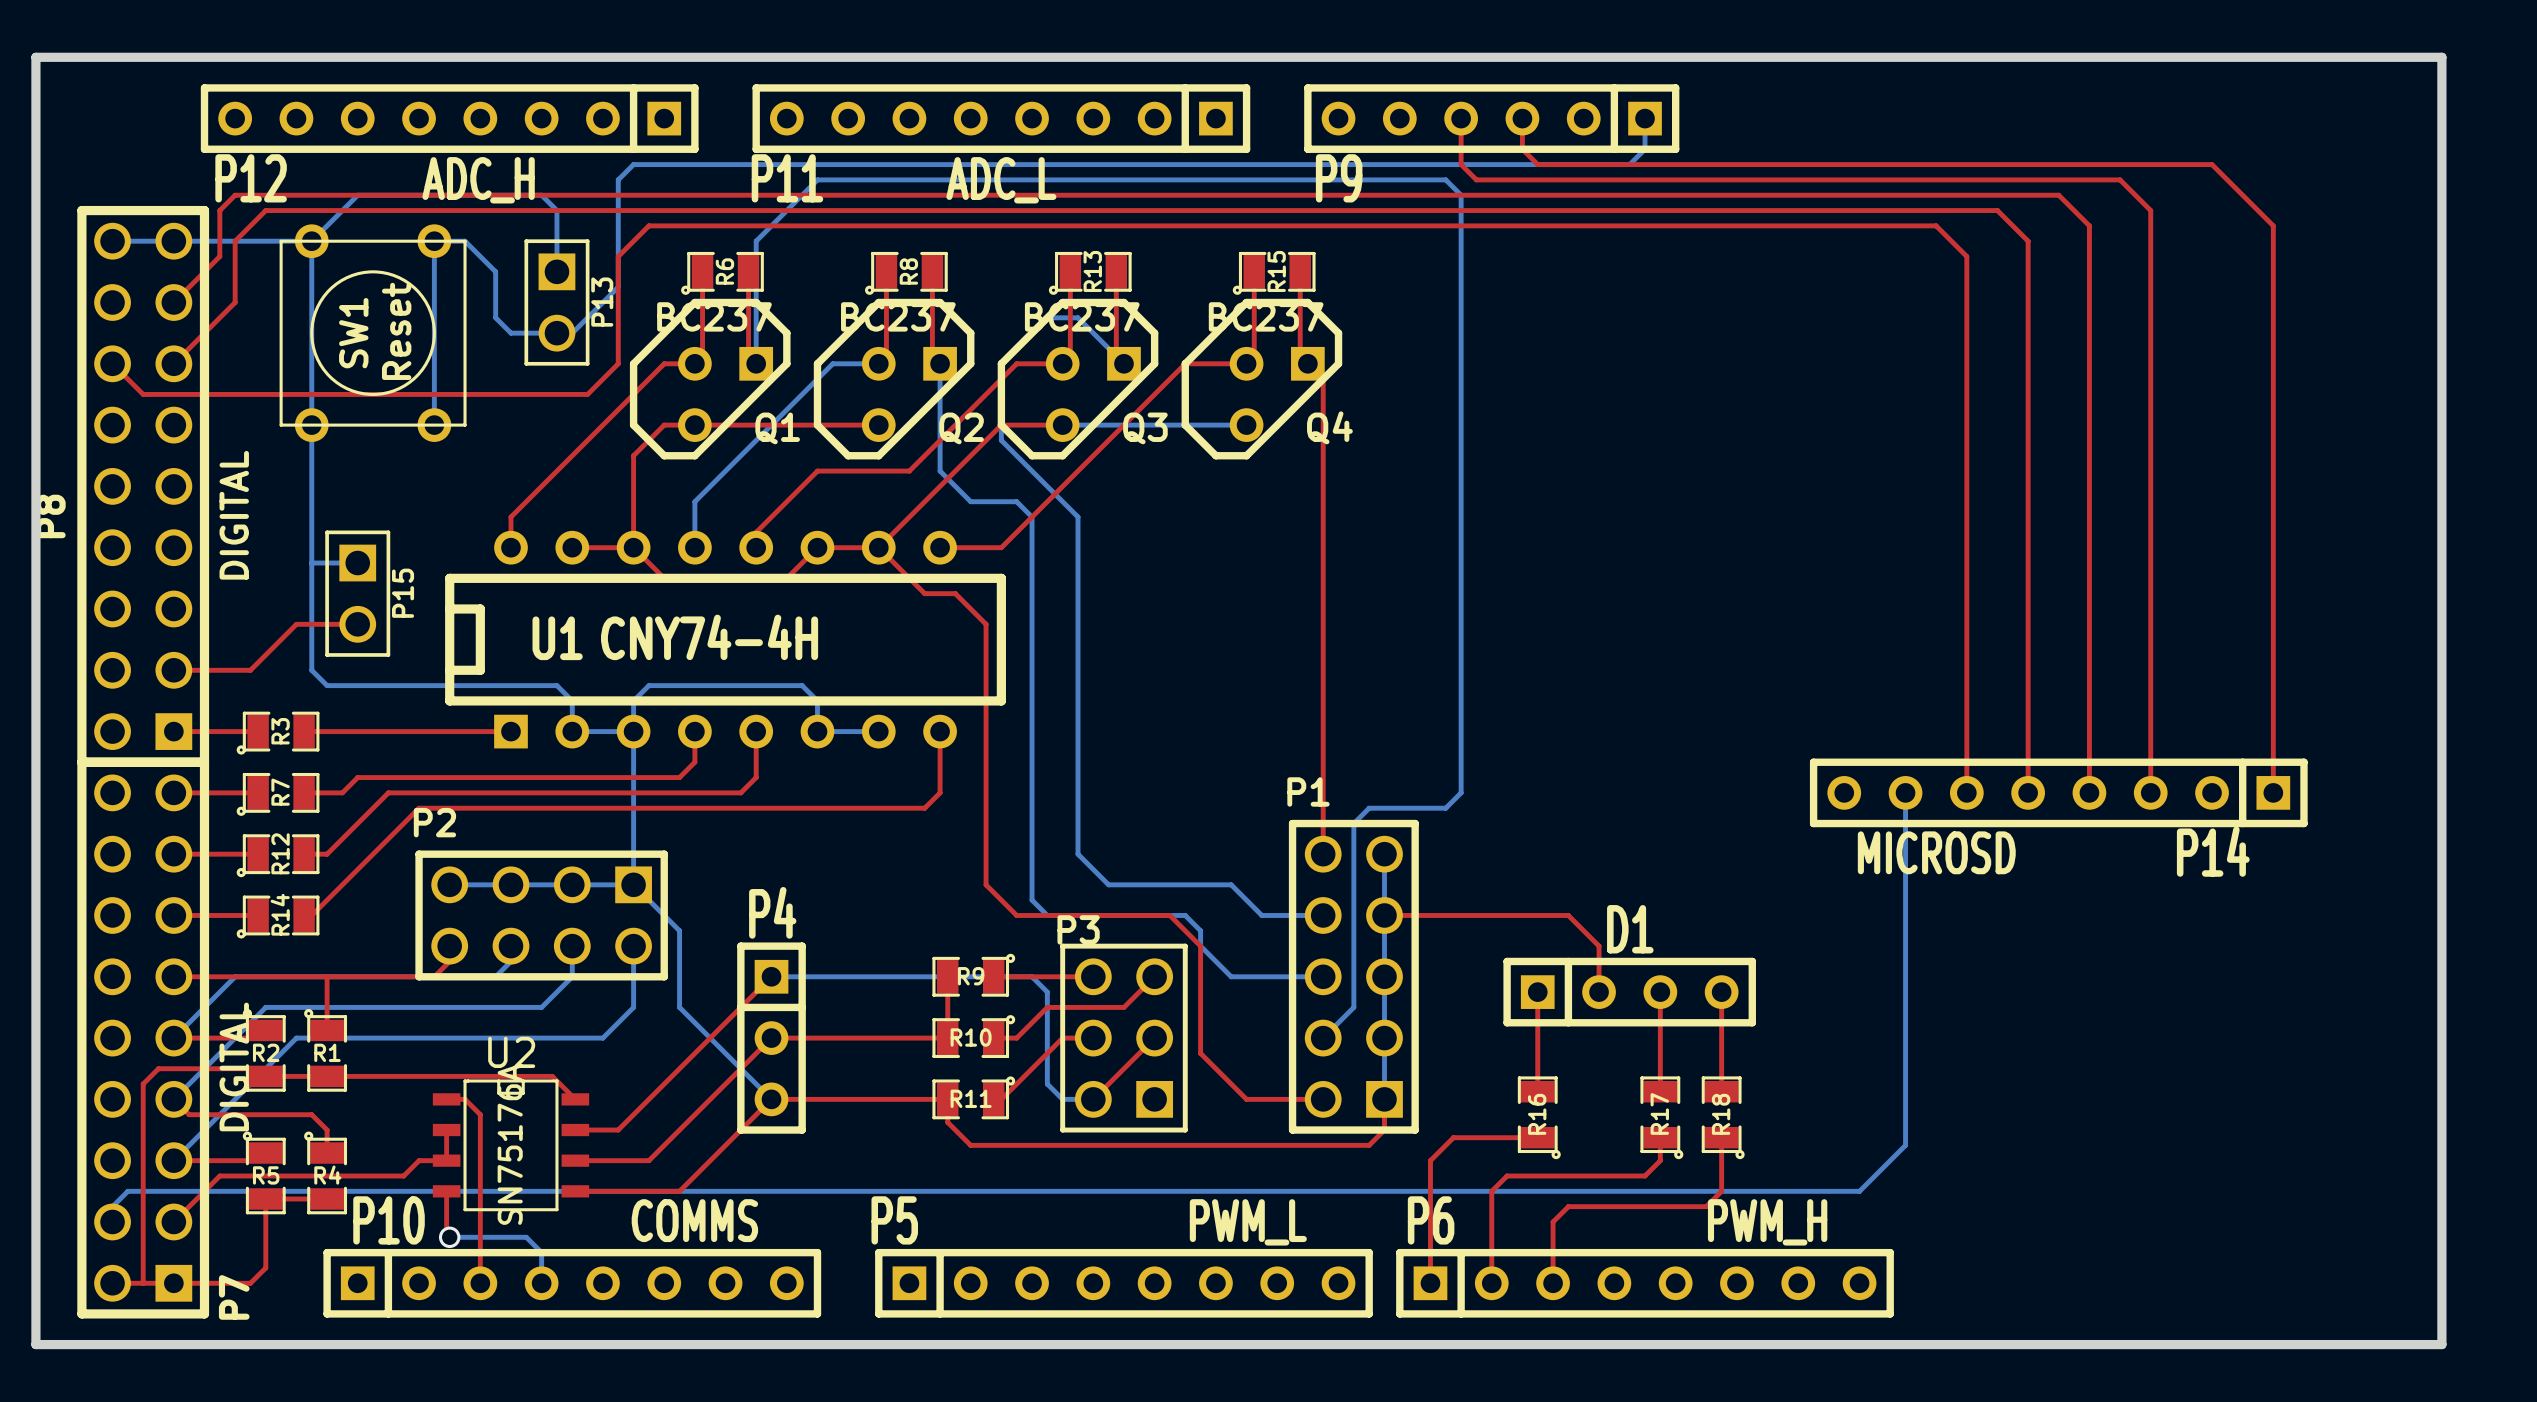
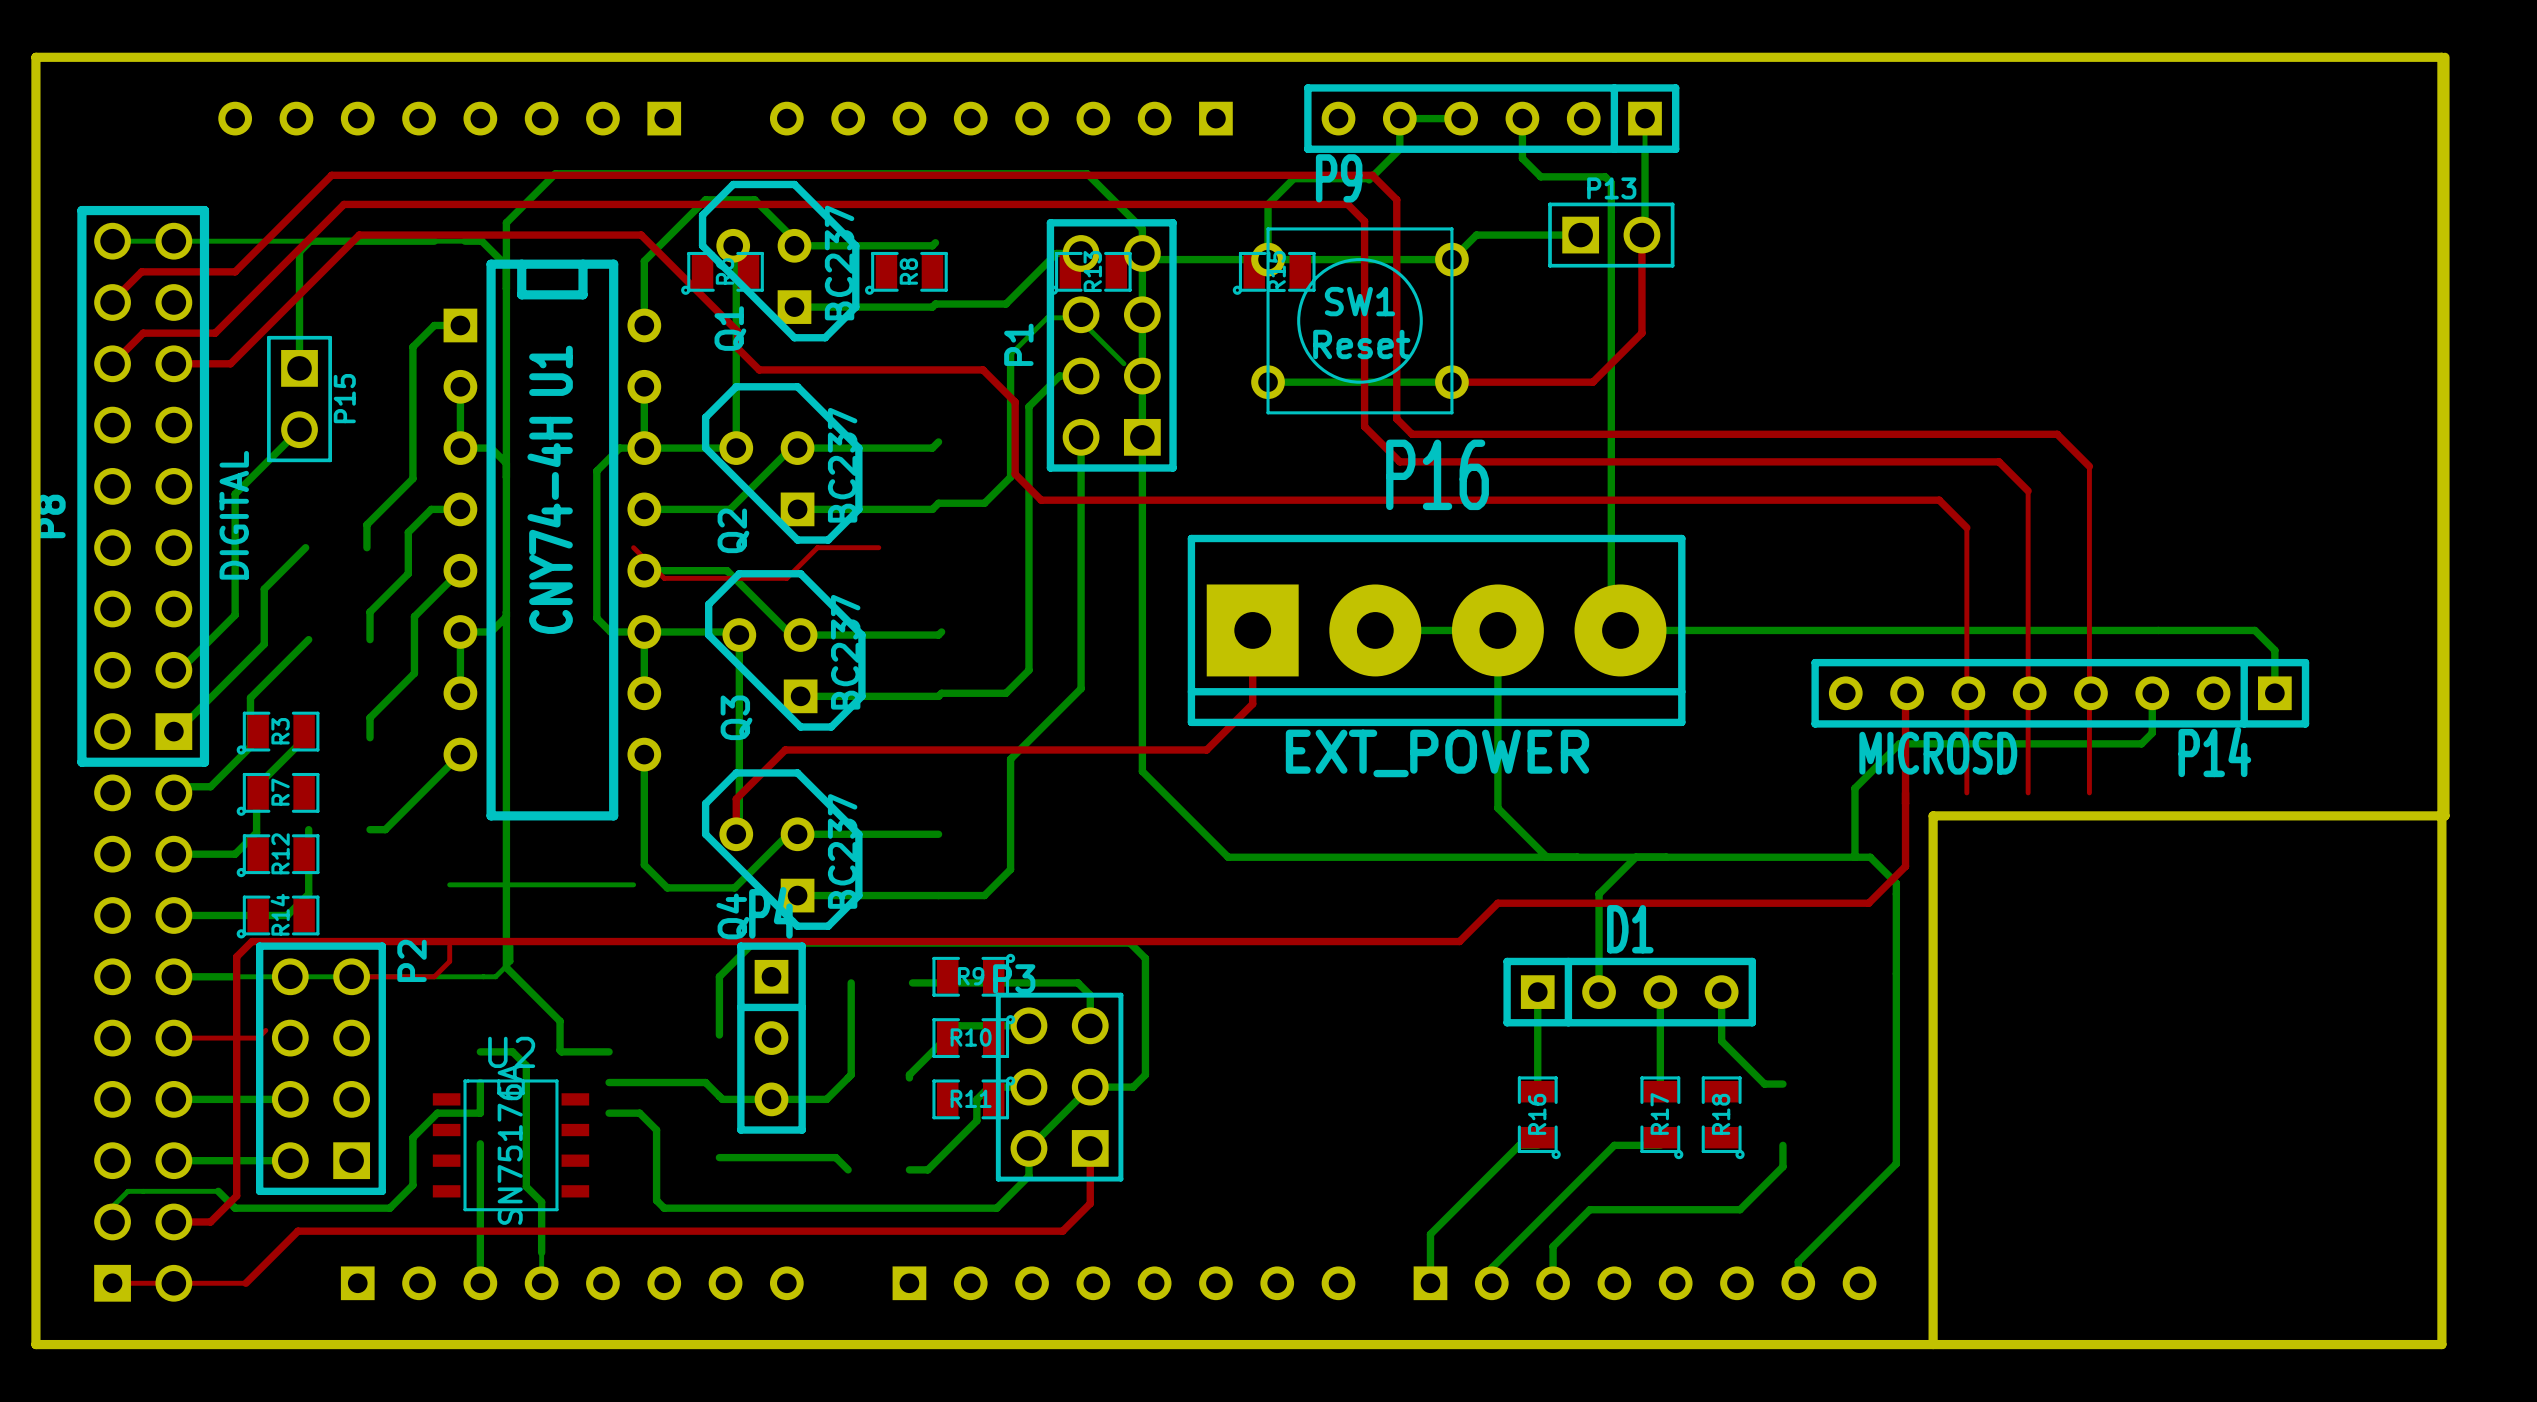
board edge: none -> (2444, 57) (2444, 815) (1933, 815) (1933, 1343)
P12 side: top (449, 118) -> bottom (449, 118)
P11 side: top (1001, 118) -> bottom (1001, 118)
top track: (1461, 118) (1461, 164) (1476, 179) (2120, 179) (2150, 210) (2150, 792) -> none
bottom track: none -> (1522, 118) (1522, 158) (1540, 176) (1605, 176) (1611, 182) (1611, 621) (1620, 630) (2254, 630) (2274, 650) (2274, 693)
top track: (1522, 118) (1522, 149) (1537, 164) (2212, 164) (2273, 225) (2273, 792) -> none
bottom track: (1645, 149) (1629, 164) (633, 164) (618, 179) (618, 287) (572, 333) (510, 333) (495, 317) (495, 271) (465, 241) -> (506, 265) (481, 241) (465, 241)
bottom track: none -> (1645, 149) (1645, 232) (1641, 235)
bottom track: (1292, 179) (817, 179) (756, 241) (756, 363) -> (1292, 179) (1268, 204) (1268, 259)
bottom track: (1369, 179) (1445, 179) (1461, 195) (1461, 792) (1445, 808) (1369, 808) (1353, 823) (1353, 1007) (1323, 1038) -> (1369, 179) (1399, 149) (1399, 118) (1461, 118)
bottom track: none -> (1580, 235) (1476, 235) (1451, 259) (1148, 259) (1142, 253)
top track: none -> (1641, 235) (1641, 333) (1592, 382) (1451, 382)
bottom track: none -> (310, 241) (299, 251) (299, 368)
bottom track: (434, 241) (434, 425) -> (434, 241) (311, 241)
bottom track: none -> (935, 242) (932, 245) (794, 245) (794, 239) (754, 199) (705, 199) (644, 261) (644, 325)
bottom track: none -> (733, 245) (736, 248) (736, 448) (619, 448) (596, 471) (596, 618) (610, 631) (736, 631) (739, 635) (739, 831) (736, 834)
bottom track: none -> (1081, 253) (1056, 253) (1005, 304) (935, 304) (932, 307) (794, 307)
bottom track: (556, 271) (556, 210) (541, 195) (357, 195) (311, 241) (311, 670) (327, 685) (556, 685) (572, 700) (572, 731) (633, 731) -> none
top track: (702, 271) (702, 356) (694, 363) (664, 363) (510, 517) (510, 547) -> none
top track: (748, 271) (748, 356) (756, 363) -> none
top track: (886, 271) (886, 356) (878, 363) -> none
top track: (932, 271) (932, 356) (940, 363) -> none
top track: (1070, 271) (1070, 356) (1062, 363) (1016, 363) (909, 471) (817, 471) (756, 532) (756, 547) -> none
top track: (1116, 271) (1116, 356) (1123, 363) -> none
top track: (1254, 271) (1254, 356) (1246, 363) (1185, 363) (1001, 547) (940, 547) -> none
top track: (1300, 271) (1300, 356) (1323, 379) (1323, 854) -> none
top track: (173, 302) (219, 256) (219, 210) (235, 195) (2058, 195) (2089, 225) (2089, 466) -> (112, 302) (141, 271) (235, 271) (331, 175) (1372, 175) (1396, 199) (1396, 418) (1412, 434) (2057, 434) (2089, 466)
P13 rotation: 0° (556, 302) -> 90° counterclockwise (1611, 235)
P13 position: (556, 302) -> (1611, 235)
bottom track: none -> (460, 325) (434, 325) (412, 346) (412, 478) (366, 524) (366, 547)
SW1 rotation: 0° (373, 333) -> 90° clockwise (1359, 320)
SW1 position: (373, 333) -> (1359, 320)
bottom track: (1010, 354) (1001, 363) (1001, 440) (1078, 517) (1078, 854) (1108, 884) (1231, 884) (1261, 915) (1323, 915) -> (1010, 354) (1010, 477) (984, 503) (938, 503) (932, 509) (797, 509)
top track: (112, 363) (143, 394) (587, 394) (618, 363) (618, 256) (648, 225) (1936, 225) (1966, 256) (1966, 527) -> (173, 363) (230, 363) (359, 235) (641, 235) (737, 331) (737, 348) (759, 369) (982, 369) (1015, 402) (1015, 474) (1041, 500) (1939, 500) (1966, 527)
top track: (173, 363) (235, 302) (235, 241) (265, 210) (1997, 210) (2028, 241) (2028, 490) -> (112, 363) (143, 333) (215, 333) (343, 204) (1347, 204) (1364, 221) (1364, 426) (1399, 461) (1999, 461) (2028, 490)
bottom track: (878, 363) (832, 363) (694, 501) (694, 547) -> none
bottom track: (940, 363) (940, 471) (970, 501) (1016, 501) (1032, 517) (1032, 900) (1047, 915) (1185, 915) (1200, 930) (1200, 946) (1231, 976) (1323, 976) -> none
bottom track: none -> (1081, 376) (1059, 376) (1028, 406) (1028, 670) (1005, 693) (941, 693) (938, 696) (800, 696)
Q1 rotation: 0° (710, 379) -> 90° clockwise (779, 261)
Q1 position: (710, 379) -> (779, 261)
Q2 rotation: 0° (894, 379) -> 90° clockwise (782, 463)
Q2 position: (894, 379) -> (782, 463)
Q3 rotation: 0° (1078, 379) -> 90° clockwise (785, 650)
Q3 position: (1078, 379) -> (785, 650)
Q4 rotation: 0° (1261, 379) -> 90° clockwise (782, 849)
Q4 position: (1261, 379) -> (782, 849)
bottom track: none -> (460, 386) (460, 448) (491, 448) (506, 463)
bottom track: none -> (644, 386) (644, 448)
top track: (878, 425) (664, 425) (633, 455) (633, 547) (572, 547) -> none
bottom track: (1062, 425) (1246, 425) -> (1268, 382) (1451, 382)
top track: (1062, 425) (1001, 425) (878, 547) (924, 593) (955, 593) (986, 624) (986, 884) (1016, 915) (1169, 915) (1200, 946) (1200, 1053) (1246, 1099) (1323, 1099) -> none
bottom track: none -> (299, 429) (235, 494) (235, 615) (179, 670) (173, 670)
bottom track: none -> (1081, 437) (1081, 688) (1010, 759) (1010, 869) (984, 895) (797, 895)
bottom track: none -> (938, 441) (932, 448) (791, 448) (730, 509) (644, 509)
bottom track: none -> (460, 509) (431, 509) (408, 532) (408, 573) (370, 612) (370, 639)
bottom track: none -> (305, 547) (264, 589) (264, 644) (176, 731) (173, 731)
bottom track: (311, 563) (357, 563) -> none
bottom track: none -> (460, 570) (414, 616) (414, 673) (370, 717) (370, 737)
bottom track: none -> (644, 570) (727, 570) (791, 635) (938, 635) (941, 631)
P15 position: (357, 593) -> (299, 399)
bottom track: none -> (506, 616) (491, 631) (460, 631) (460, 693)
top track: (357, 624) (296, 624) (250, 670) (173, 670) -> none
top track: none -> (1252, 630) (1252, 704) (1206, 749) (785, 749) (736, 799) (736, 834)
bottom track: none -> (1375, 630) (1497, 630) (1497, 808) (1546, 857)
P16: none -> EXT_POWER (1436, 630)
bottom track: none -> (644, 631) (644, 693)
bottom track: none -> (308, 639) (250, 697) (250, 746) (210, 786) (179, 786) (173, 792)
U1 rotation: 0° (725, 639) -> 90° clockwise (552, 540)
bottom track: none -> (2152, 693) (2152, 733) (2141, 743) (1899, 743) (1854, 788) (1854, 857)
top track: (173, 731) (258, 731) -> none
top track: (304, 731) (510, 731) -> none
top track: (694, 731) (694, 762) (679, 777) (357, 777) (342, 792) (304, 792) -> none
top track: (756, 731) (756, 777) (740, 792) (388, 792) (327, 854) (304, 854) -> none
bottom track: (878, 731) (817, 731) (817, 700) (802, 685) (648, 685) (633, 700) (633, 884) (679, 930) (679, 1007) (771, 1099) -> none
top track: (940, 731) (940, 792) (924, 808) (419, 808) (311, 915) (304, 915) -> none
bottom track: none -> (308, 737) (305, 737) (256, 786) (256, 832) (235, 854) (173, 854)
bottom track: none -> (460, 754) (385, 829) (370, 829)
bottom track: none -> (644, 754) (644, 864) (667, 887) (734, 887) (788, 834) (938, 834)
P1 name position: P1 (1308, 791) -> P1 (1018, 344)
top track: (173, 792) (258, 792) -> none
bottom track: (1905, 792) (1905, 1145) (1859, 1191) (218, 1191) -> (480, 1082) (480, 1113) (437, 1113) (412, 1137) (412, 1185) (389, 1208) (235, 1208) (218, 1191)
P14 position: (2058, 792) -> (2060, 693)
P1 footprint: [1288, 819, 1419, 1134] -> [1046, 219, 1177, 472]
bottom track: none -> (308, 829) (308, 894) (287, 915) (173, 915)
top track: (173, 854) (258, 854) -> none
bottom track: (1384, 854) (1384, 1099) -> none
bottom track: none -> (1635, 857) (1599, 894) (1599, 992)
top track: (173, 915) (258, 915) -> none
P2 rotation: 0° (541, 915) -> 90° clockwise (320, 1068)
P2 position: (541, 915) -> (320, 1068)
top track: (1384, 915) (1568, 915) (1599, 946) (1599, 992) -> none
bottom track: (572, 946) (572, 976) (541, 1007) (265, 1007) (173, 1099) -> (290, 1099) (173, 1099)
bottom track: (633, 946) (633, 1007) (602, 1038) (296, 1038) (173, 1160) -> (290, 1160) (173, 1160)
top track: (173, 976) (351, 976) -> none
bottom track: (235, 976) (173, 1038) -> (235, 976) (173, 976)
top track: (327, 976) (327, 1030) -> none
bottom track: (771, 976) (1032, 976) (1047, 992) (1047, 1084) (1062, 1099) (1093, 1099) -> none
top track: (771, 976) (618, 1130) (575, 1130) -> none
top track: (947, 976) (947, 1038) (771, 1038) (648, 1160) (575, 1160) -> none
top track: (993, 976) (1093, 976) -> none
top track: (1154, 976) (1123, 1007) (1047, 1007) (1016, 1038) (993, 1038) -> none
bottom track: none -> (851, 982) (851, 1074) (826, 1099) (722, 1099) (705, 1082) (609, 1082)
bottom track: none -> (912, 982) (1078, 982) (1090, 995) (1090, 1025)
bottom track: none -> (1537, 992) (1537, 1084)
top track: (1537, 992) (1537, 1091) -> none
bottom track: none -> (1660, 992) (1660, 1084)
top track: (1660, 992) (1660, 1091) -> none
bottom track: none -> (1721, 992) (1721, 1041) (1764, 1084) (1782, 1084)
top track: (1721, 992) (1721, 1091) -> none
bottom track: none -> (1028, 1025) (958, 1025) (909, 1074) (909, 1077)
bottom track: none -> (719, 1035) (719, 976) (753, 943) (1130, 943) (1145, 958) (1145, 1074) (1133, 1087) (1090, 1087) (1028, 1148) (1028, 1176) (996, 1208) (664, 1208) (656, 1200) (656, 1130) (639, 1113) (609, 1113)
P7 side: top (143, 1038) -> bottom (143, 1038)
top track: (1093, 1038) (1062, 1038) (1001, 1099) (993, 1099) -> none
P3 position: (1123, 1038) -> (1059, 1087)
top track: (1154, 1038) (1093, 1099) -> none
R2: (264, 1050) -> none
R1: (325, 1050) -> none
bottom track: none -> (609, 1051) (561, 1051) (560, 1021) (506, 967) (506, 222) (555, 173) (1087, 173) (1142, 228) (1142, 771) (1228, 857) (1870, 857) (1896, 883) (1896, 1163) (1798, 1261) (1798, 1283)
bottom track: none -> (1028, 1087) (989, 1087) (976, 1099) (976, 1120) (927, 1169) (909, 1169)
top track: (173, 1099) (189, 1114) (311, 1114) (327, 1130) (327, 1153) -> none
top track: (446, 1099) (465, 1099) (480, 1114) (480, 1283) -> none
top track: (575, 1099) (552, 1076) (265, 1076) (250, 1068) (158, 1068) (143, 1084) (143, 1283) -> none
top track: (1384, 1099) (1384, 1130) (1369, 1145) (970, 1145) (947, 1122) (947, 1099) (771, 1099) (679, 1191) (575, 1191) -> none
top track: (446, 1130) (446, 1160) (419, 1160) (403, 1176) (219, 1176) (173, 1221) -> (1907, 693) (1905, 694) (1905, 866) (1868, 903) (1497, 903) (1459, 941) (252, 941) (236, 956) (236, 1195) (210, 1221) (173, 1221)
top track: (1537, 1137) (1453, 1137) (1430, 1160) (1430, 1283) -> none
top track: (1660, 1137) (1660, 1160) (1645, 1176) (1507, 1176) (1491, 1191) (1491, 1283) -> none
top track: (1721, 1137) (1721, 1191) (1706, 1206) (1568, 1206) (1553, 1221) (1553, 1283) -> none
bottom track: none -> (480, 1143) (480, 1283)
bottom track: none -> (1537, 1145) (1519, 1145) (1430, 1234) (1430, 1283)
bottom track: none -> (1660, 1145) (1614, 1145) (1491, 1267) (1491, 1283)
bottom track: none -> (1782, 1145) (1782, 1166) (1740, 1209) (1589, 1209) (1553, 1246) (1553, 1283)
top track: (265, 1153) (258, 1160) (173, 1160) -> none
bottom track: none -> (719, 1157) (835, 1157) (848, 1169)
R5: (264, 1172) -> none
R4: (325, 1172) -> none
top track: (446, 1191) (446, 1234) (449, 1237) -> none
top track: (327, 1198) (265, 1198) (265, 1267) (250, 1283) (245, 1283) -> (1090, 1148) (1090, 1203) (1062, 1231) (297, 1231) (245, 1283)
bottom track: (449, 1237) (526, 1237) (541, 1252) -> (480, 1051) (512, 1051) (526, 1065) (526, 1186) (541, 1202) (541, 1252)
via: (449, 1237) -> none
P10 side: top (572, 1283) -> bottom (572, 1283)
P5 side: top (1123, 1283) -> bottom (1123, 1283)
P6 side: top (1645, 1283) -> bottom (1645, 1283)

